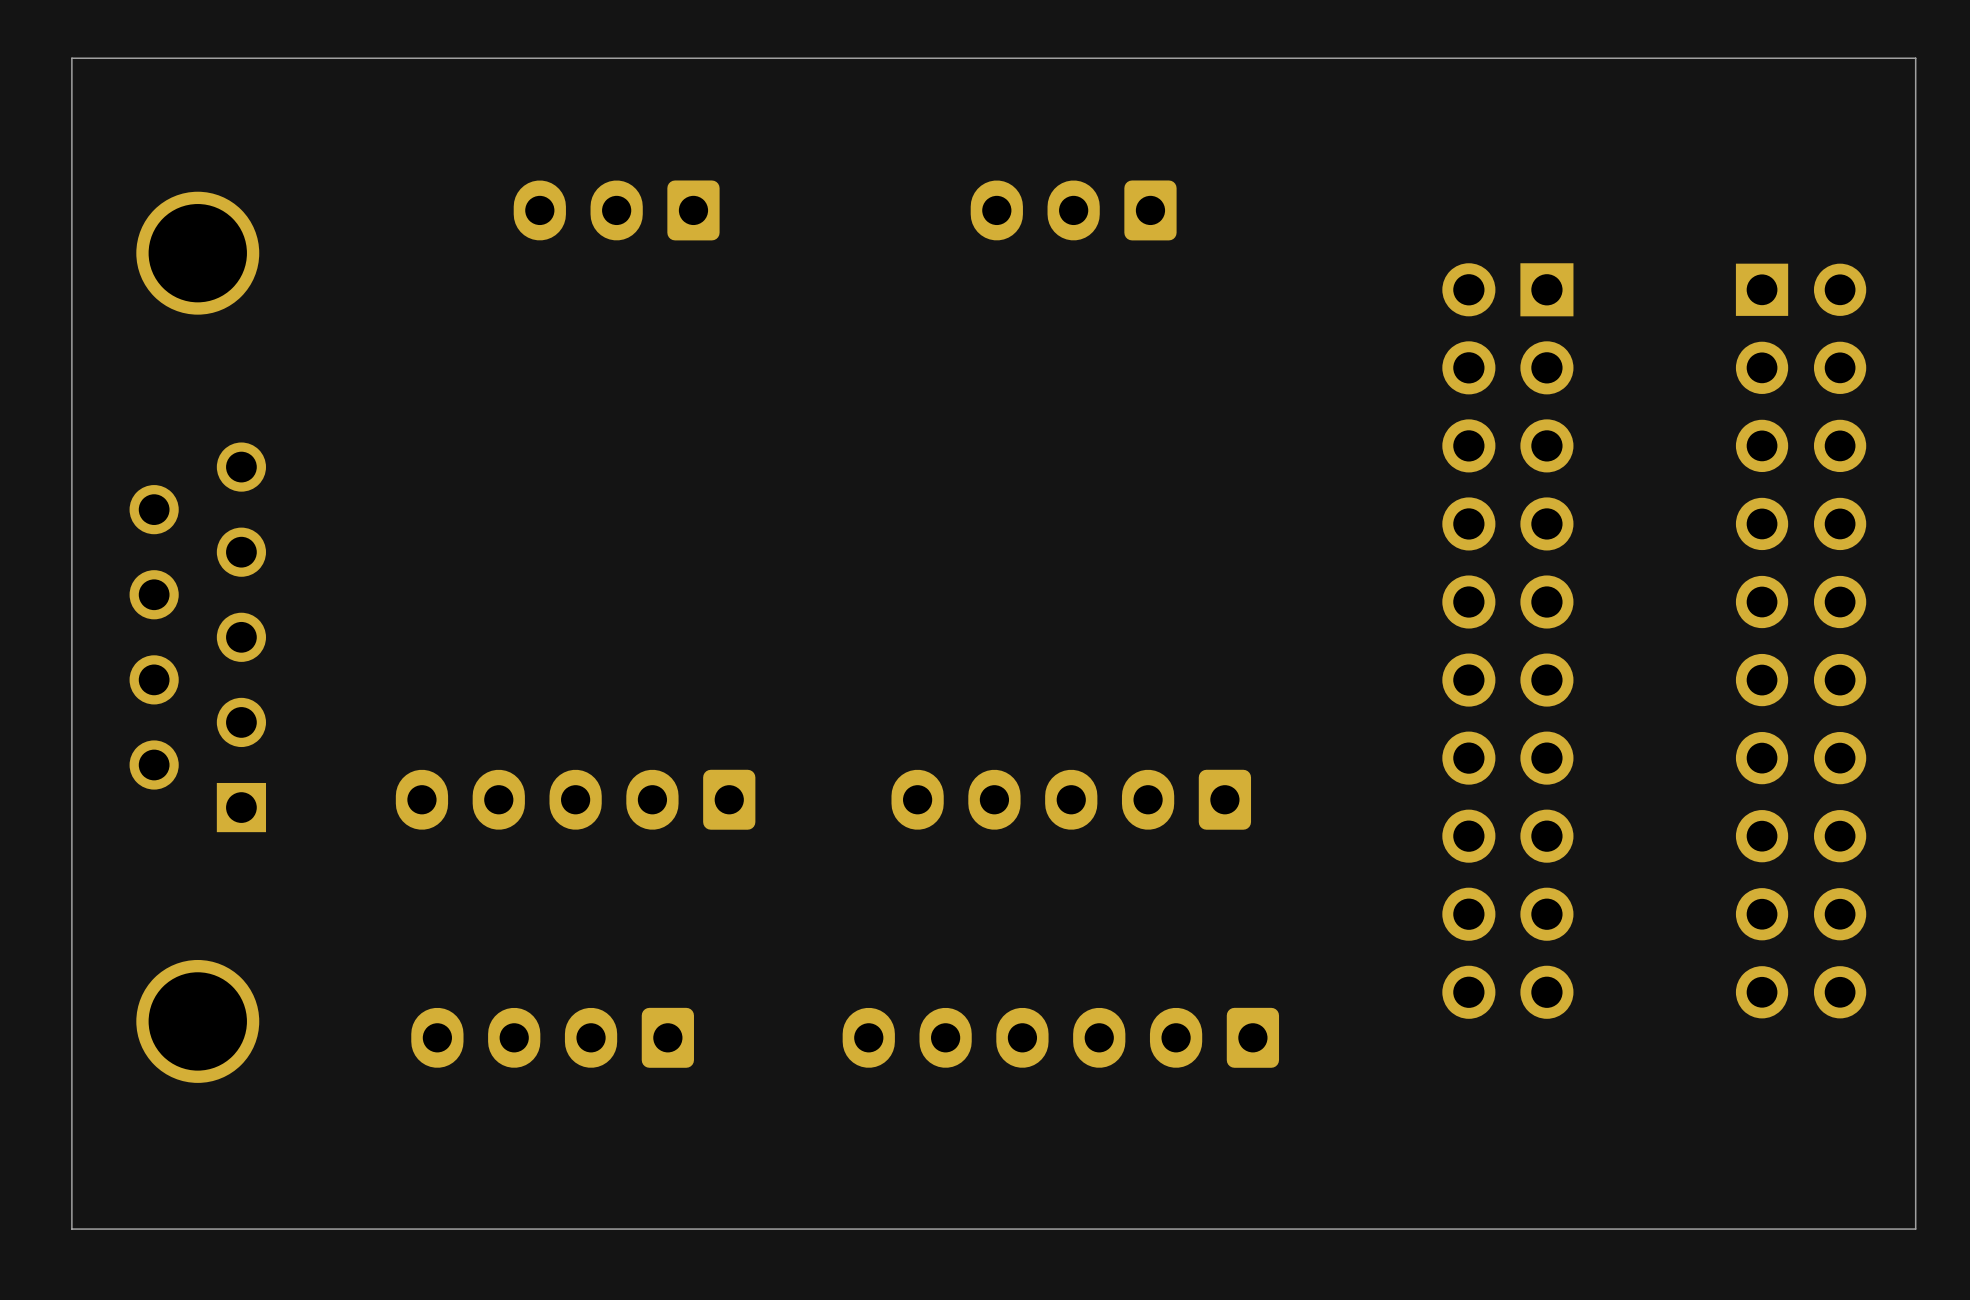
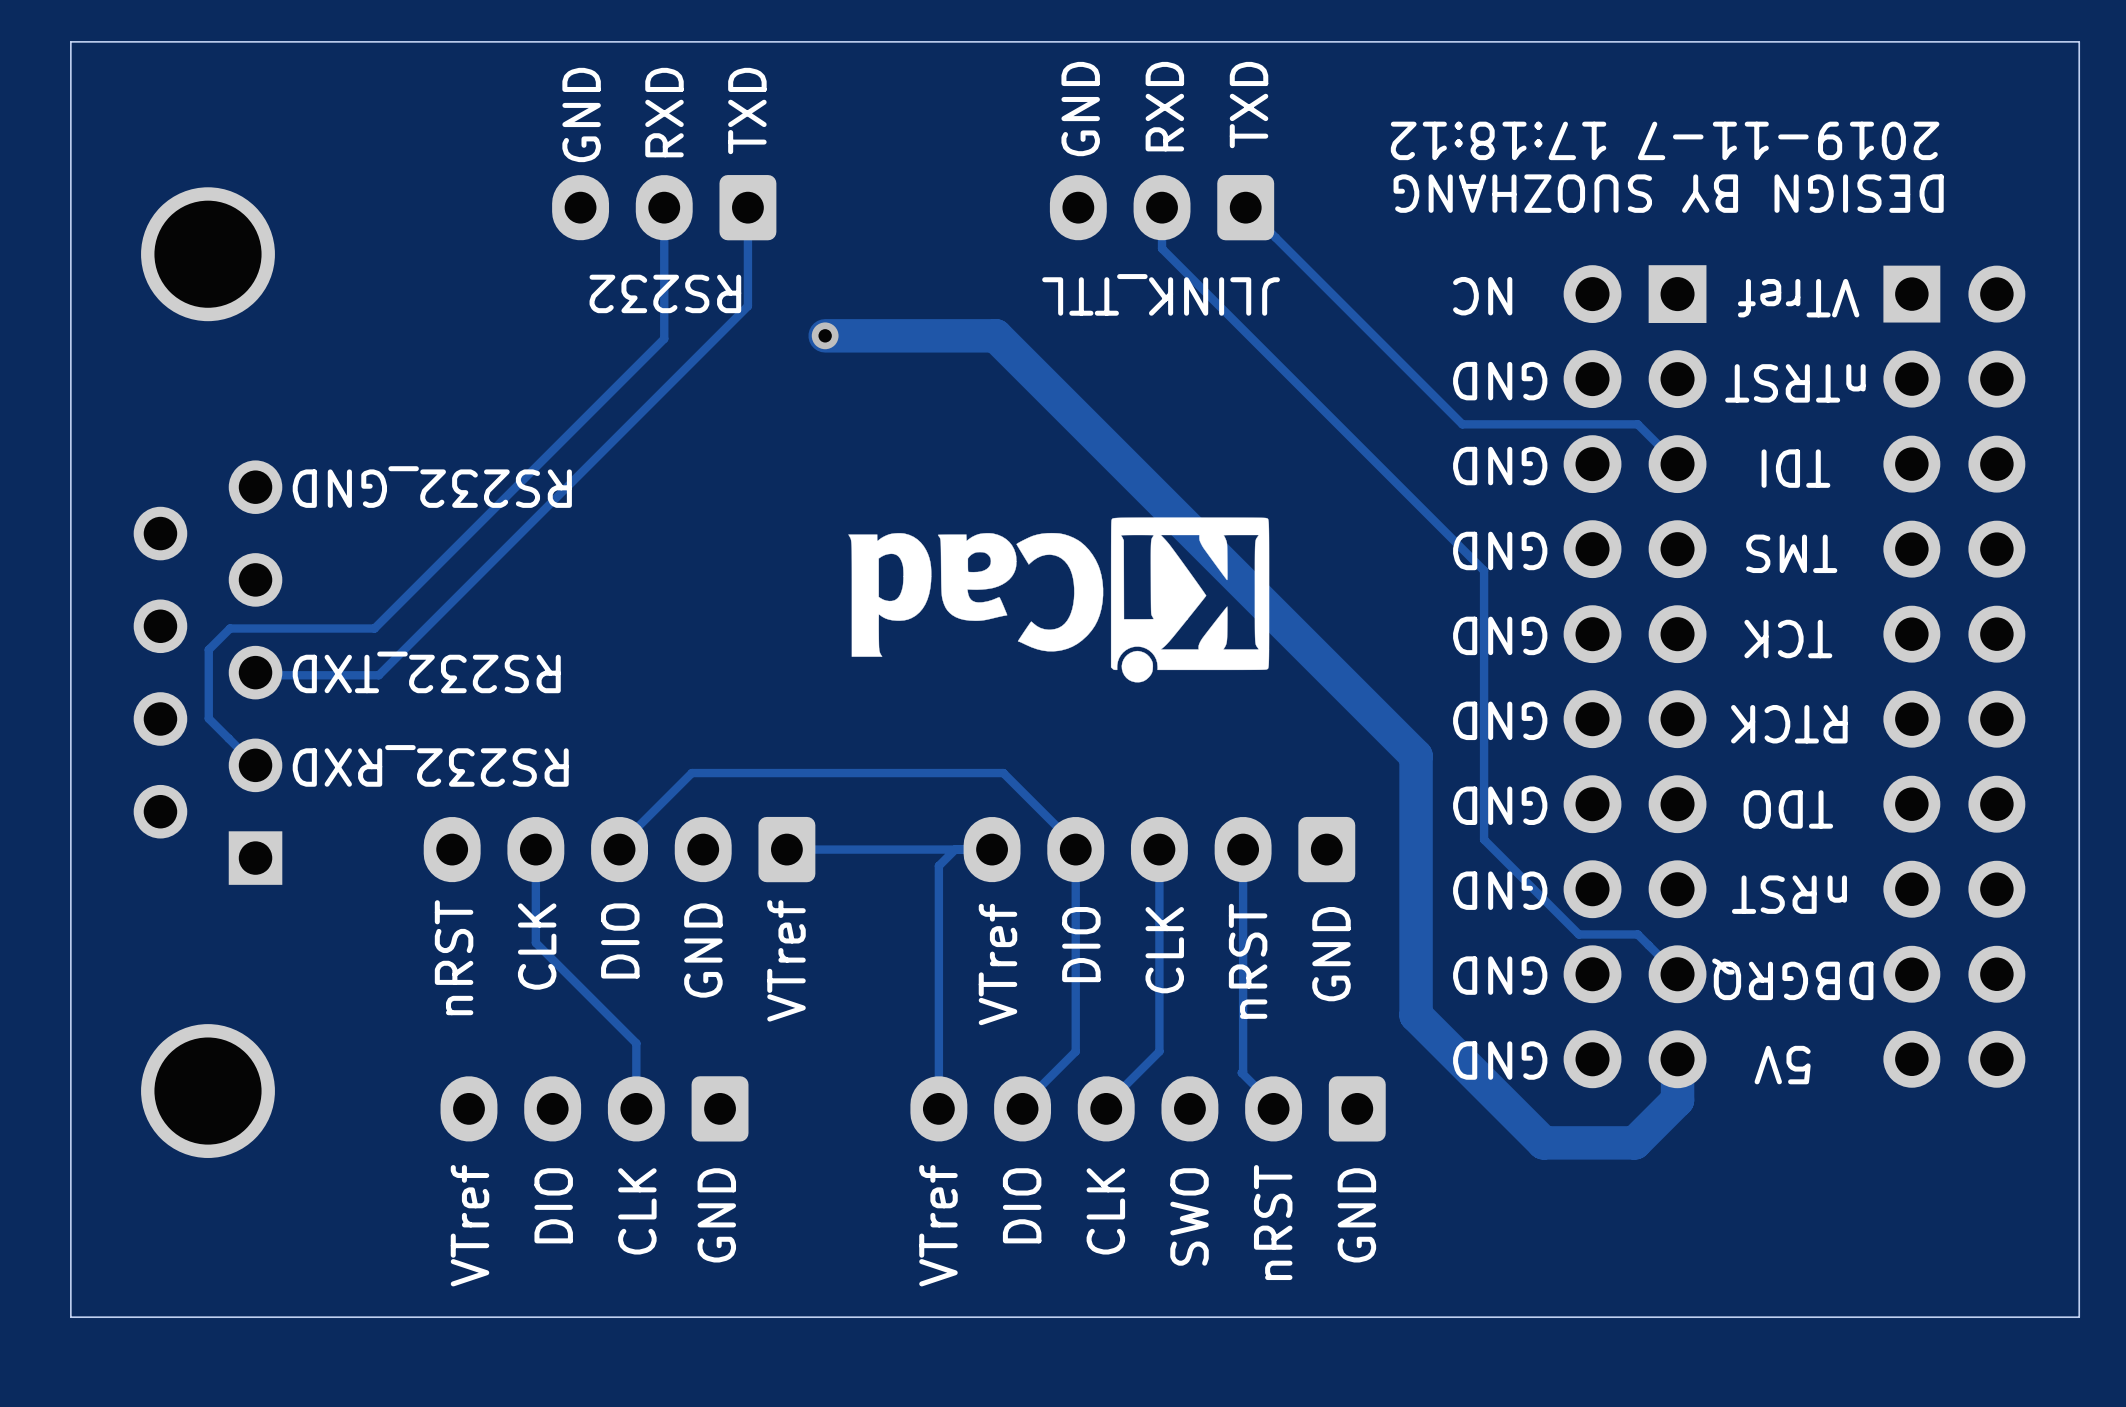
text: none -> TXD (1249, 105)
text: none -> RXD (1164, 106)
text: none -> GND (1080, 109)
text: none -> TXD (747, 111)
text: none -> RXD (664, 112)
text: none -> GND (581, 114)
text: none -> 2019-11-7 17:18:12 (1665, 140)
text: none -> DESIGN BY SUOZHANG (1668, 193)
track: none -> (664, 207) (664, 338) (374, 628) (230, 628) (208, 649) (208, 718) (255, 765)
track: none -> (747, 207) (747, 306) (378, 675) (258, 675) (255, 672)
track: none -> (1162, 207) (1162, 248) (1484, 570) (1484, 839) (1578, 934) (1637, 934) (1677, 974)
track: none -> (1245, 207) (1462, 424) (1637, 424) (1677, 464)
text: none -> JLINK_TTL (1161, 294)
text: none -> RS232 (665, 293)
text: none -> NC (1482, 296)
text: none -> VTref (1798, 298)
track: none -> (825, 335) (995, 335) (1416, 756) (1416, 1015) (1543, 1142) (1634, 1142) (1677, 1100) (1677, 1059)
via: none -> (825, 335)
text: none -> GND (1500, 381)
text: none -> nTRST (1795, 383)
text: none -> GND (1500, 466)
text: none -> TDI (1795, 468)
text: none -> RS232_GND (432, 487)
drawing: none -> [848, 517, 1270, 683]
text: none -> GND (1500, 550)
text: none -> TMS (1791, 553)
text: none -> GND (1500, 635)
text: none -> TCK (1788, 639)
text: none -> RS232_TXD (426, 672)
text: none -> GND (1500, 720)
text: none -> RTCK (1789, 724)
text: none -> RS232_RXD (430, 765)
text: none -> GND (1500, 805)
text: none -> TDO (1788, 809)
track: none -> (535, 849) (535, 942) (636, 1043) (636, 1108)
track: none -> (619, 849) (619, 845) (691, 773) (1003, 773) (1075, 845) (1075, 1051) (1022, 1104) (1022, 1108)
track: none -> (955, 849) (938, 865) (938, 1108)
track: none -> (992, 849) (786, 849)
track: none -> (1159, 849) (1159, 1051) (1106, 1104) (1106, 1108)
track: none -> (1243, 849) (1241, 1072) (1273, 1104) (1273, 1108)
text: none -> GND (1500, 890)
text: none -> nRST (1789, 894)
text: none -> DIO (620, 940)
text: none -> DIO (1081, 944)
text: none -> CLK (537, 946)
text: none -> CLK (1164, 950)
text: none -> GND (703, 950)
text: none -> GND (1331, 954)
text: none -> nRST (454, 957)
text: none -> VTref (786, 960)
text: none -> nRST (1248, 961)
text: none -> VTref (997, 964)
text: none -> GND (1500, 975)
text: none -> DBGRQ (1792, 979)
text: none -> GND (1500, 1060)
text: none -> 5V (1782, 1065)
text: none -> DIO (553, 1205)
text: none -> DIO (1022, 1205)
text: none -> CLK (637, 1211)
text: none -> CLK (1105, 1211)
text: none -> GND (716, 1215)
text: none -> GND (1356, 1215)
text: none -> SWO (1189, 1216)
text: none -> nRST (1273, 1222)
text: none -> VTref (470, 1225)
text: none -> VTref (938, 1225)

